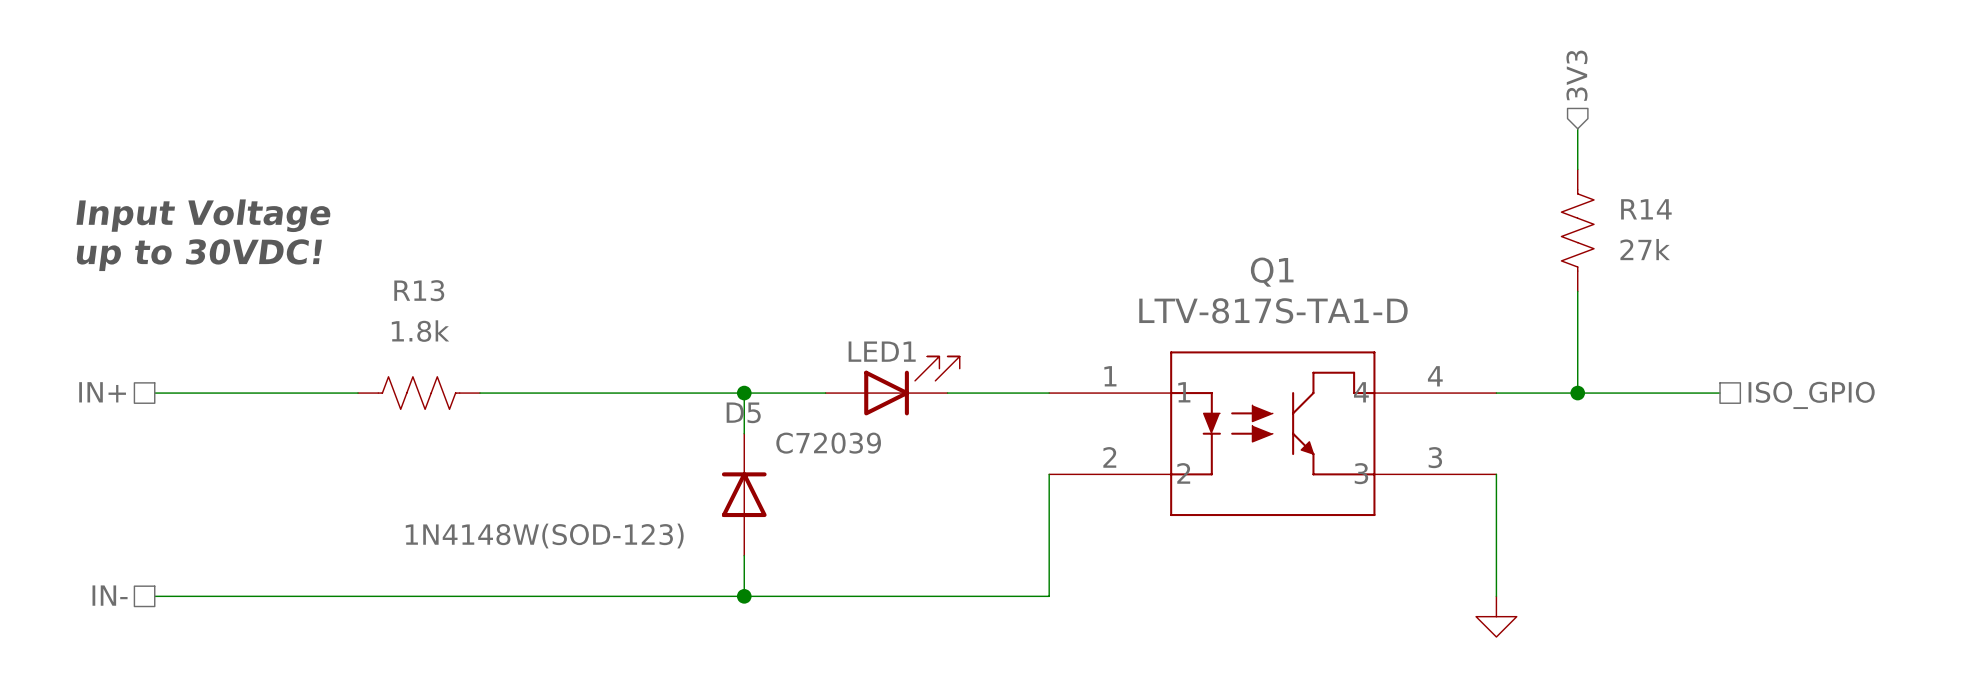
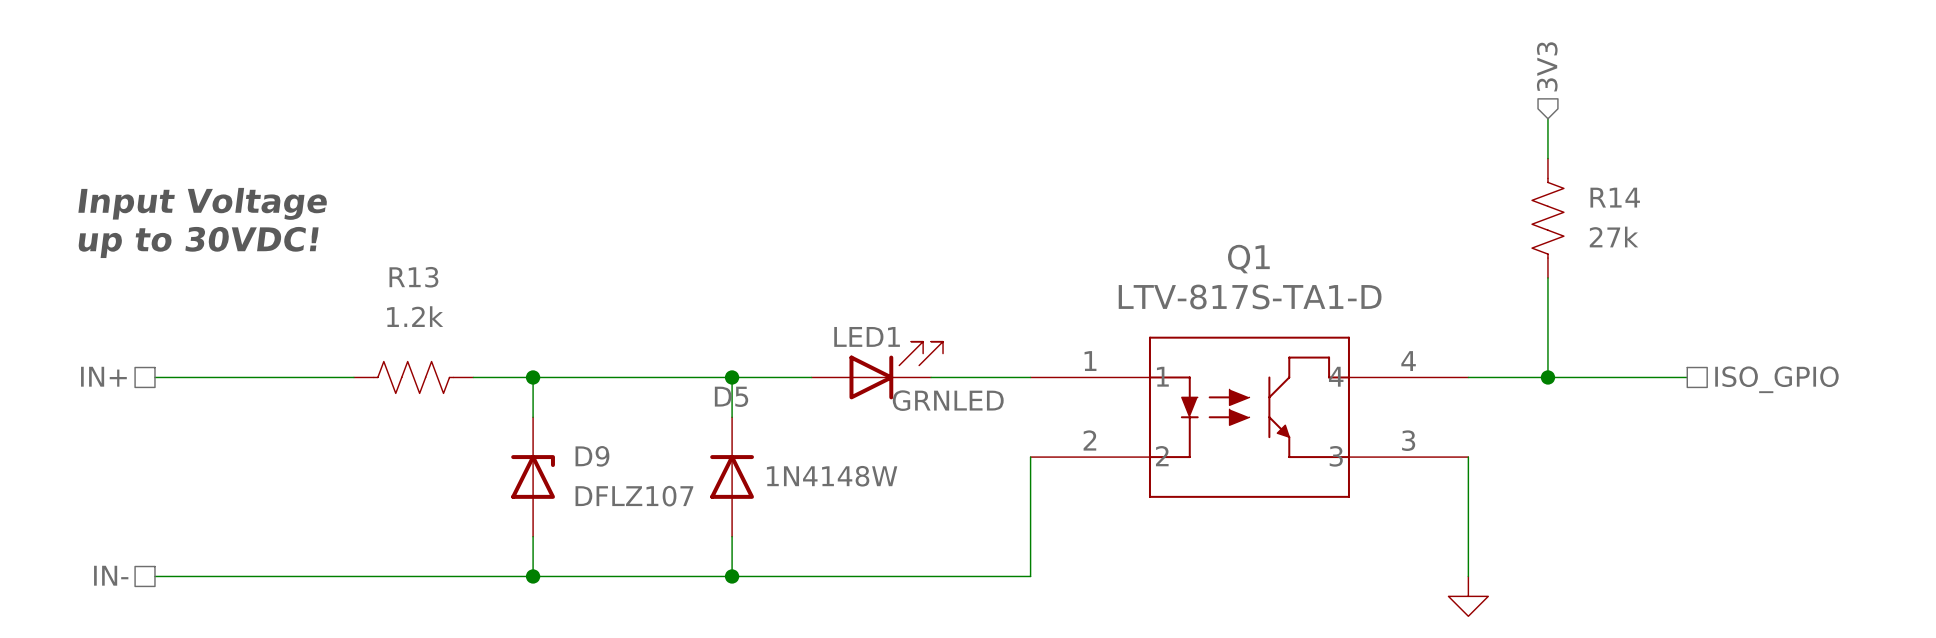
R13 value: 1.8k (420, 331) -> 1.2k (415, 316)
wire: none -> (533, 377) (533, 417)
junction: none -> (533, 377)
LED1 value: C72039 (828, 443) -> GRNLED (948, 400)
D9: none -> DFLZ107 (533, 476)
D5 value: 1N4148W(SOD-123) (544, 536) -> 1N4148W (832, 476)
wire: none -> (533, 536) (533, 576)
junction: none -> (533, 576)

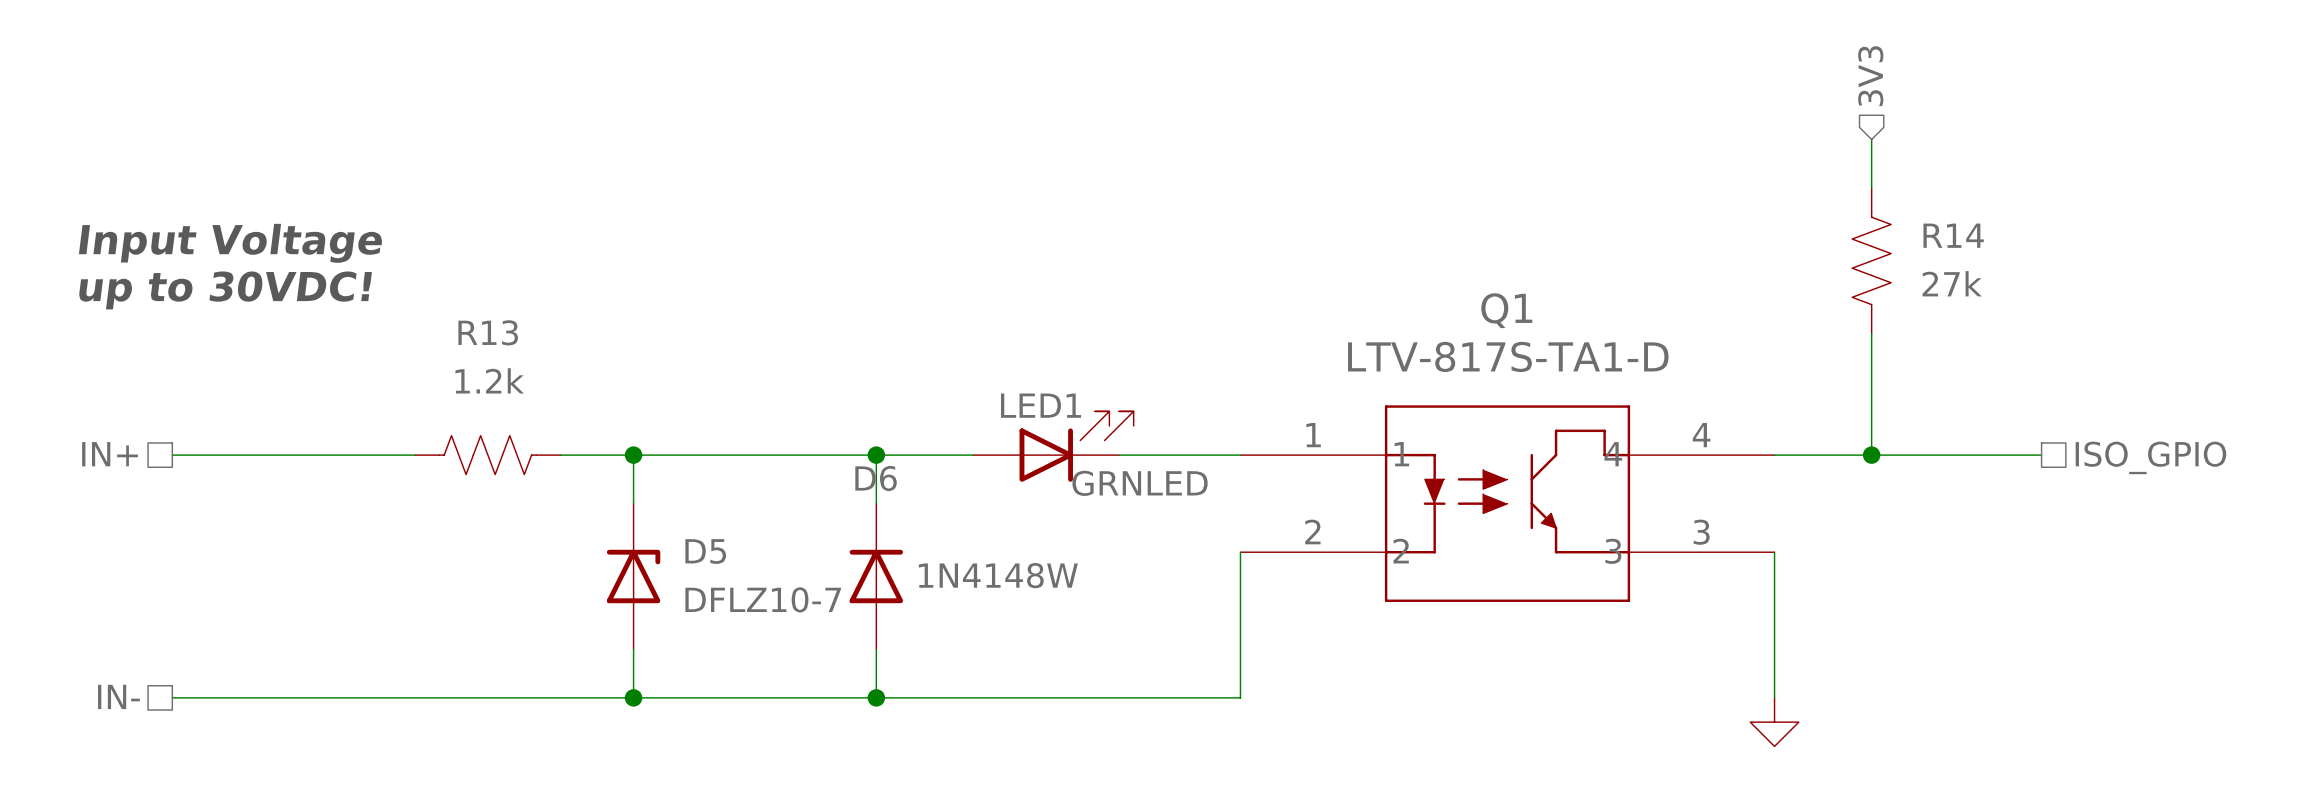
D5 name: D5 (731, 396) -> D6 (876, 478)
D9 name: D9 (592, 456) -> D5 (705, 551)
D9 value: DFLZ107 (634, 496) -> DFLZ10-7 (763, 599)

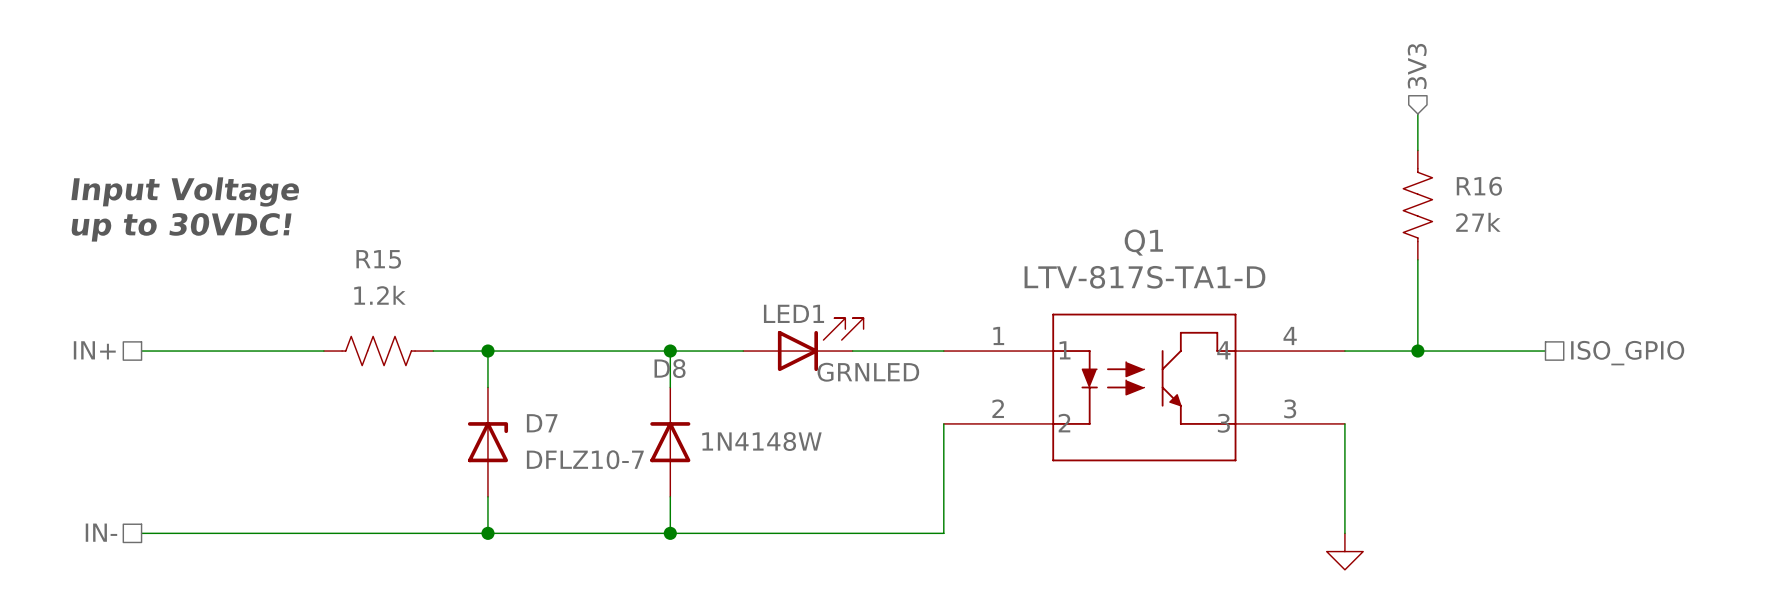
R14 name: R14 (1953, 235) -> R16 (1479, 186)
R13 name: R13 (488, 332) -> R15 (378, 259)
D6 name: D6 (876, 478) -> D8 (670, 368)
D5 name: D5 (705, 551) -> D7 (542, 423)

